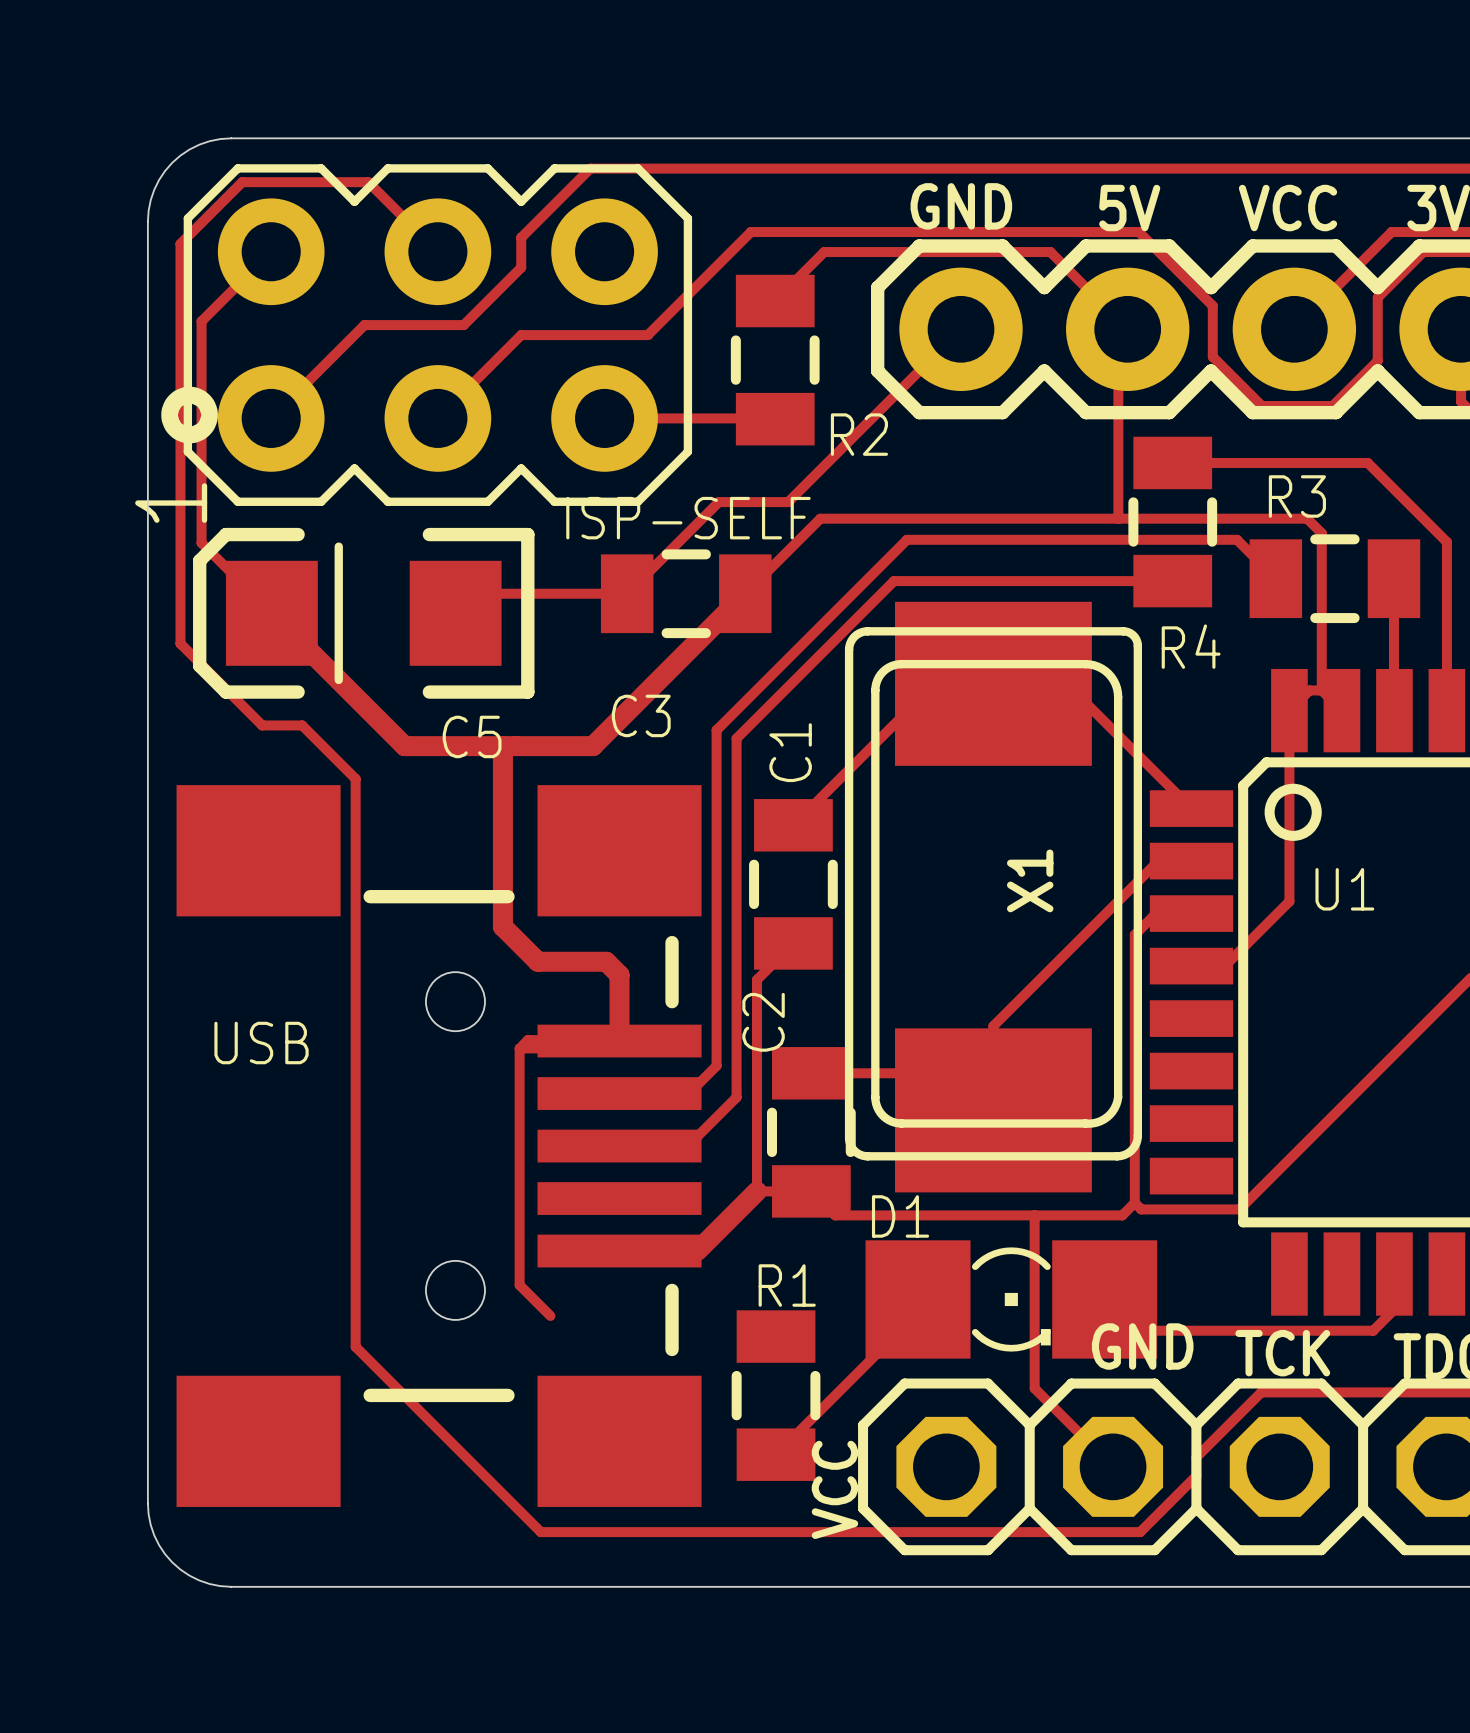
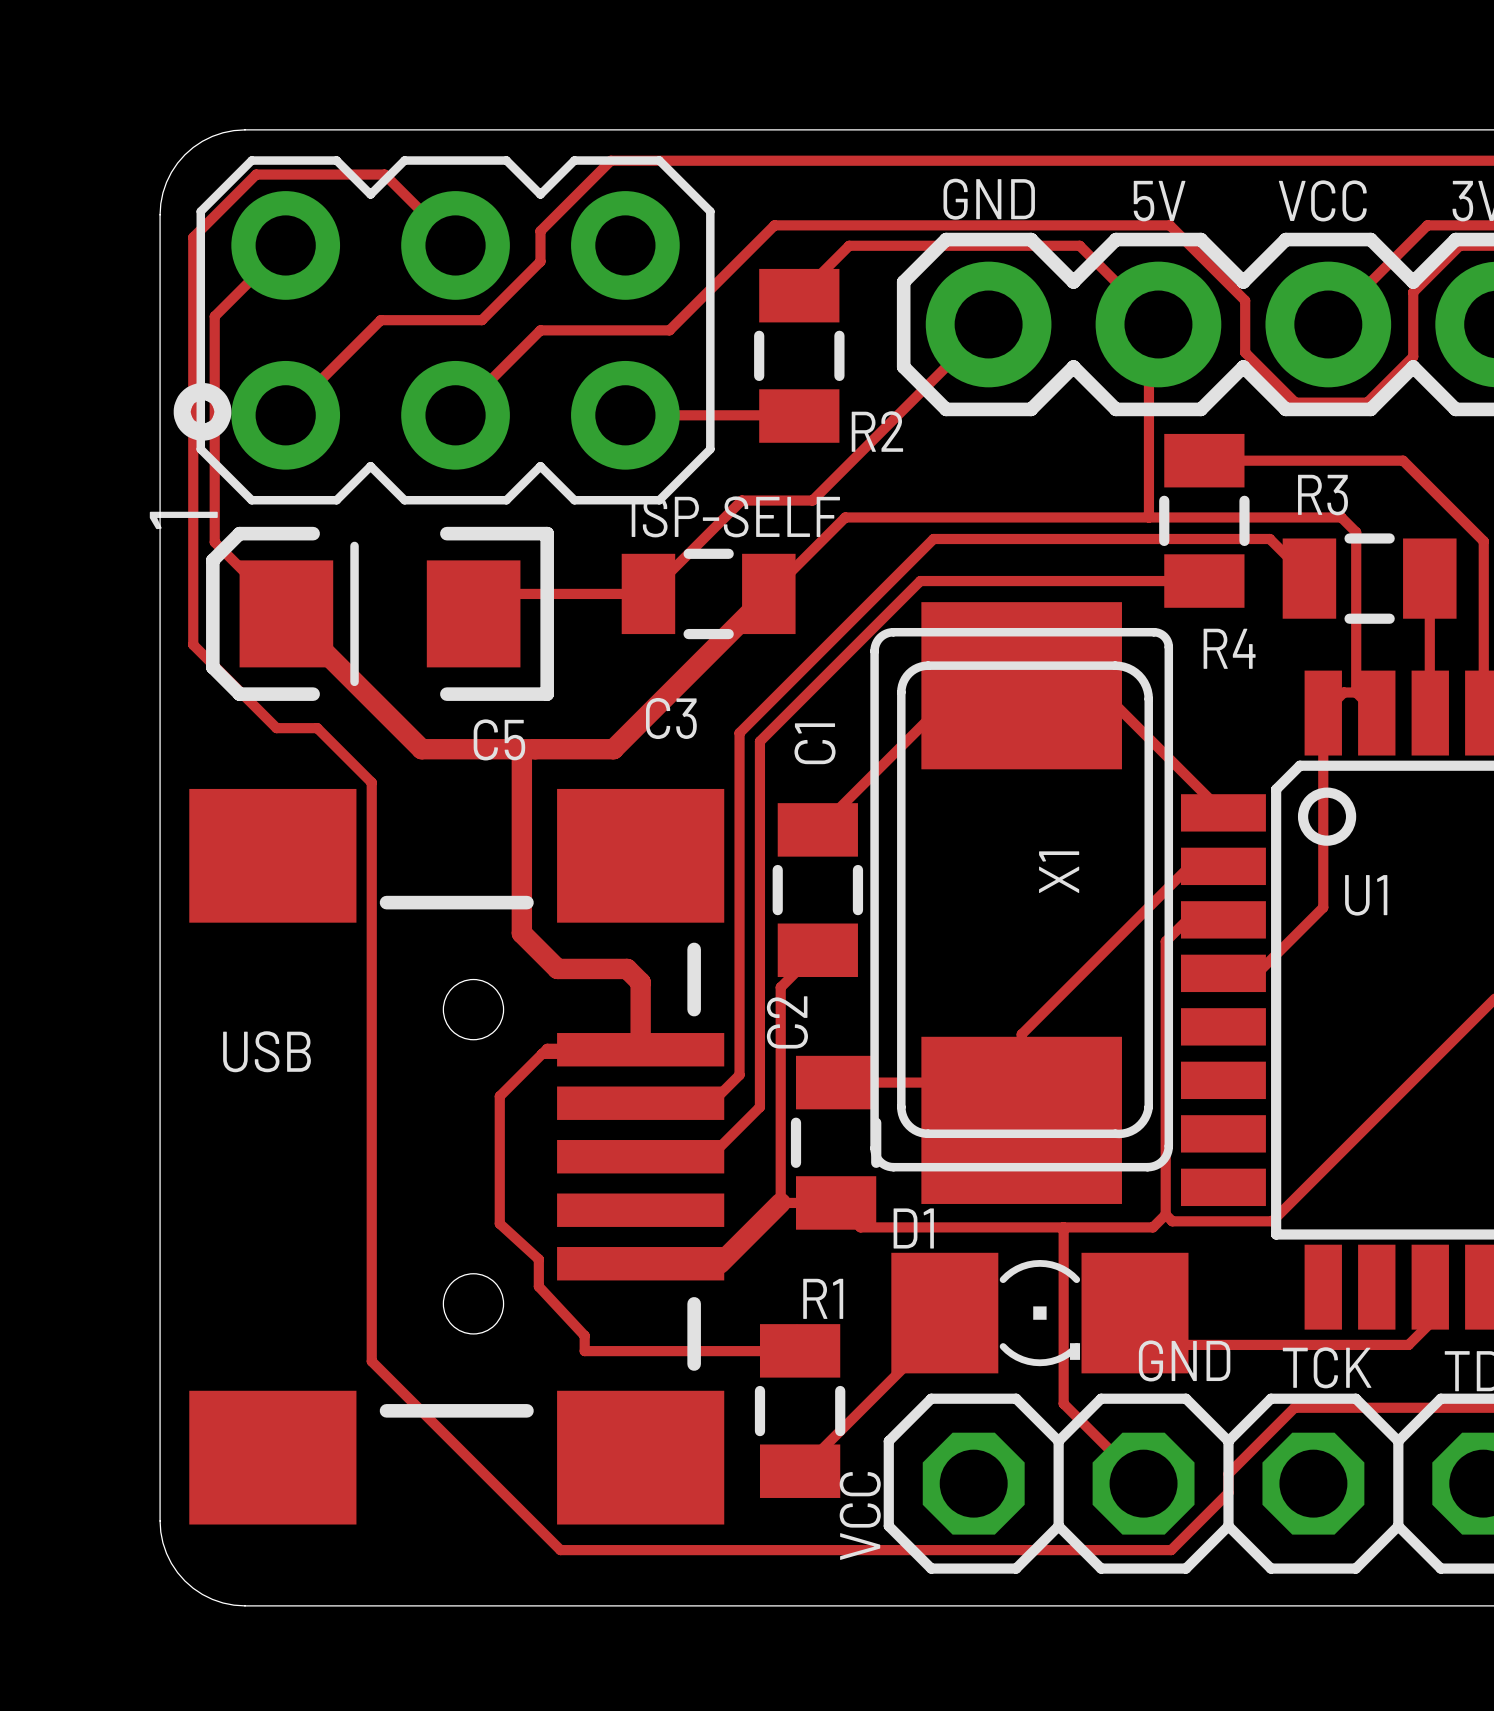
track: (612, 1048) (519, 1048) (519, 1246) -> (636, 1053) (542, 1053) (499, 1096) (499, 1223) (538, 1259)
track: (519, 1273) (519, 1285) (550, 1315) -> (538, 1286) (584, 1335) (584, 1351) (799, 1351)

